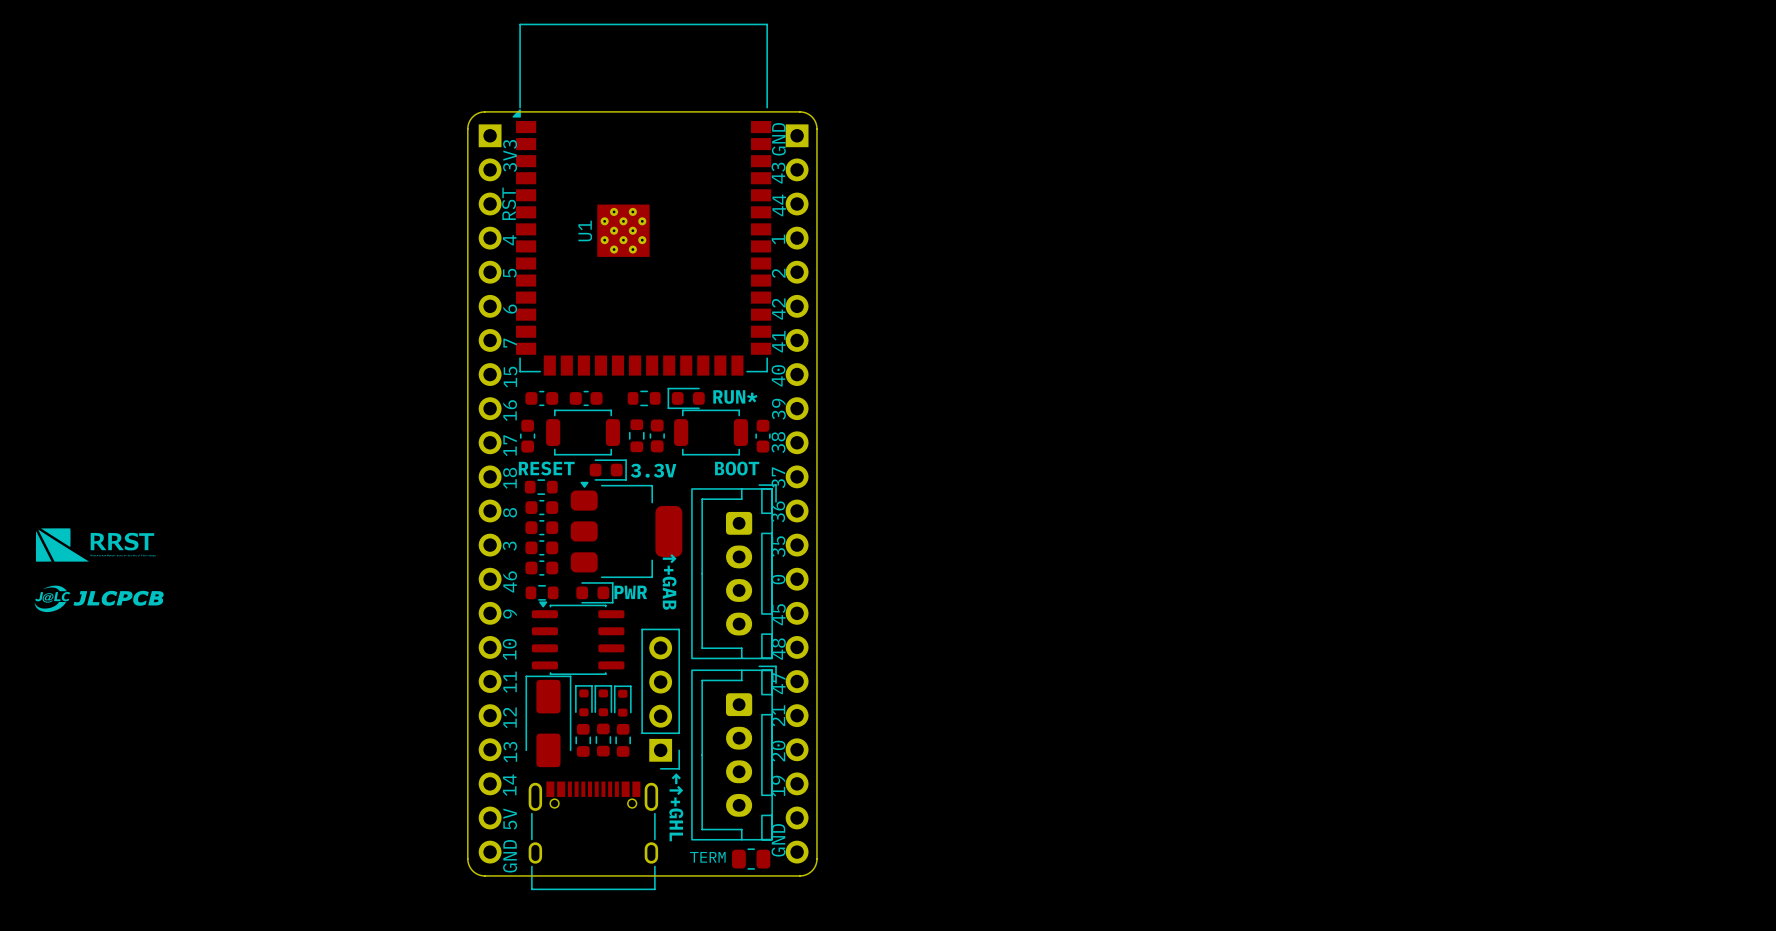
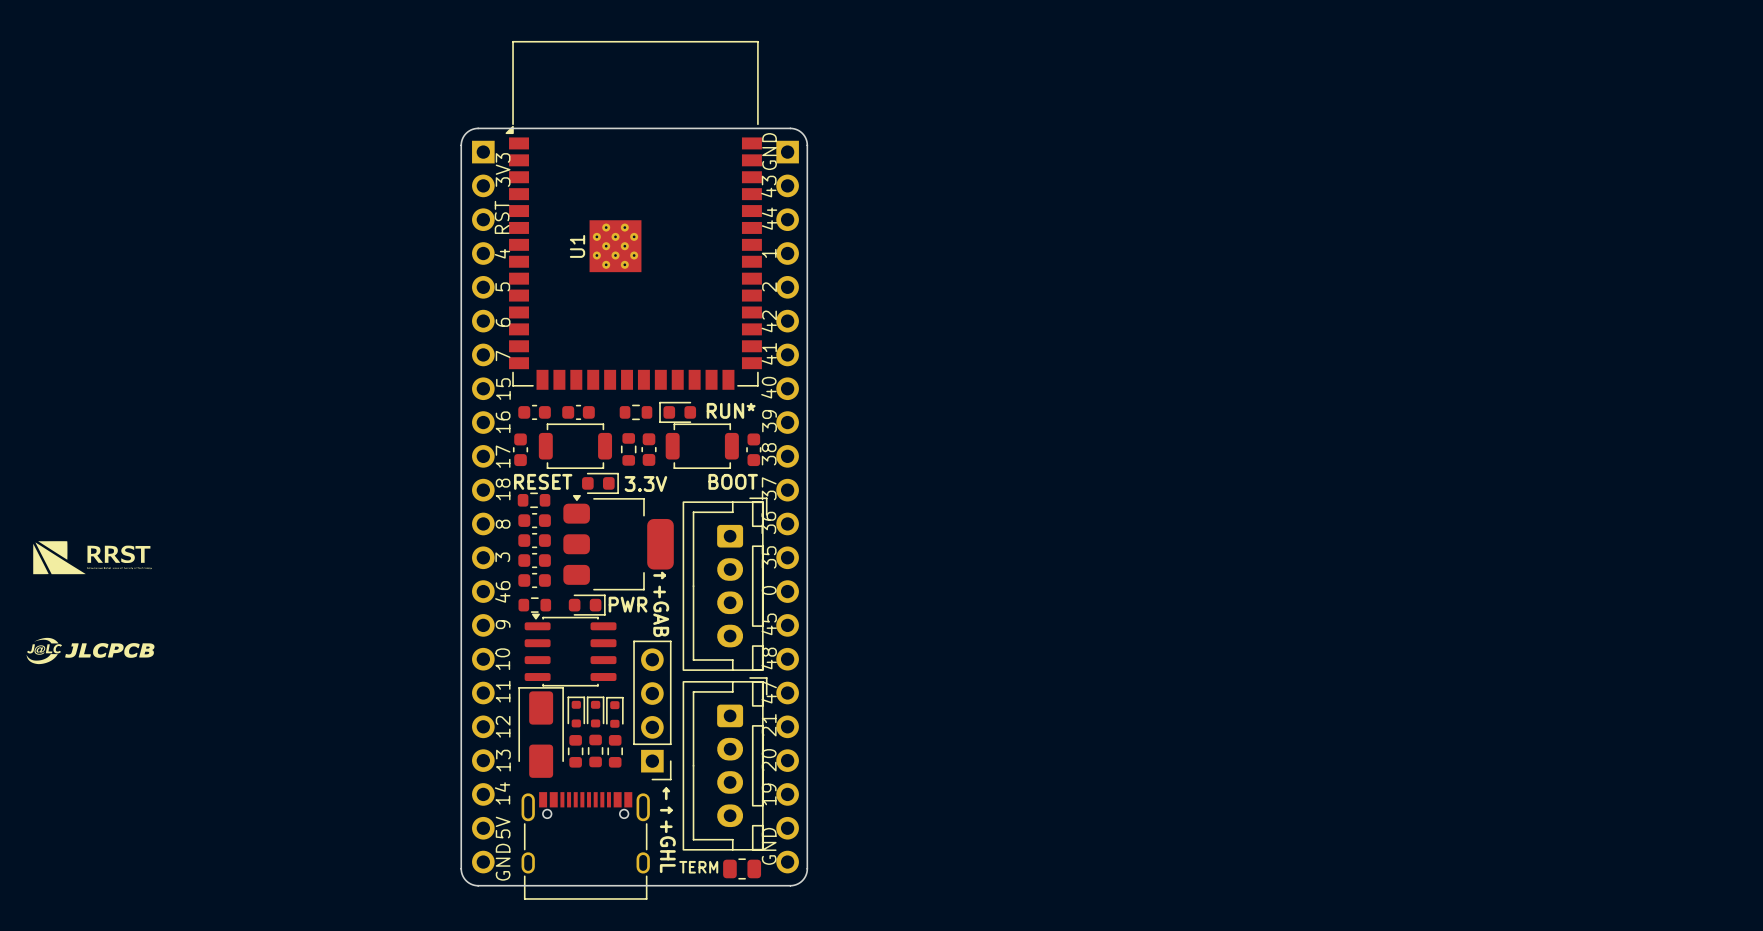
drawing position: (99, 598) -> (90, 650)

